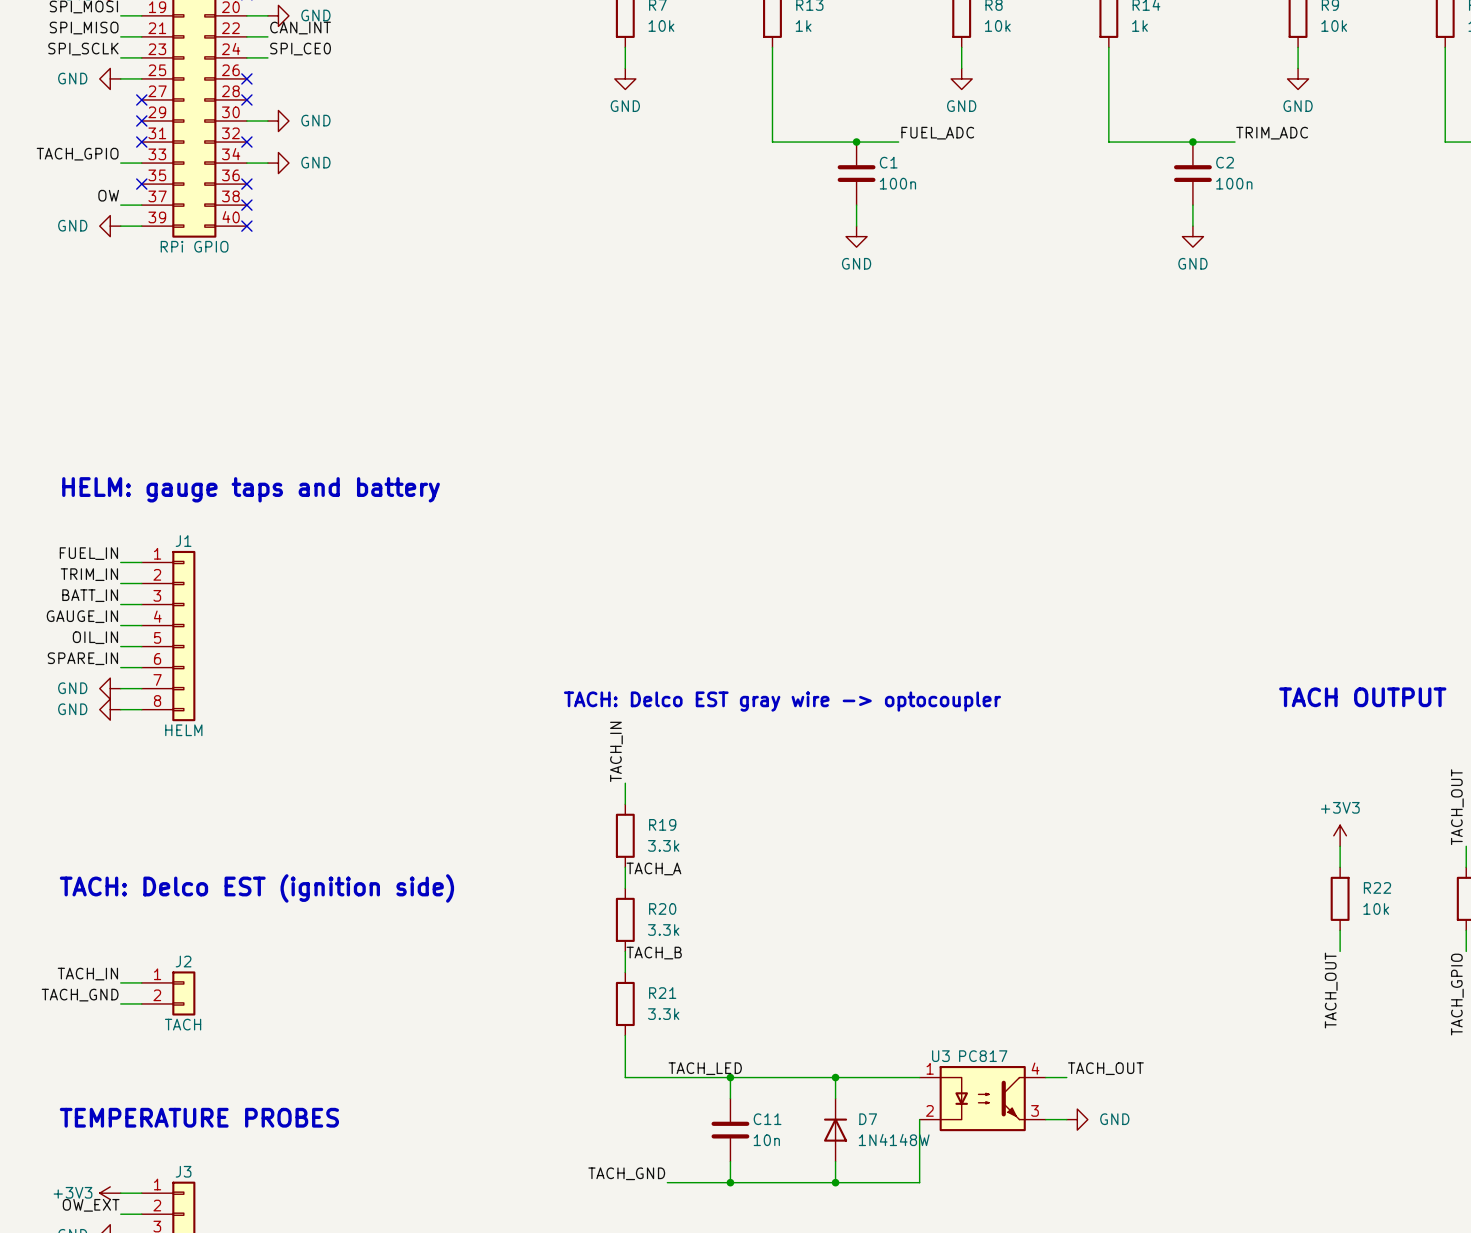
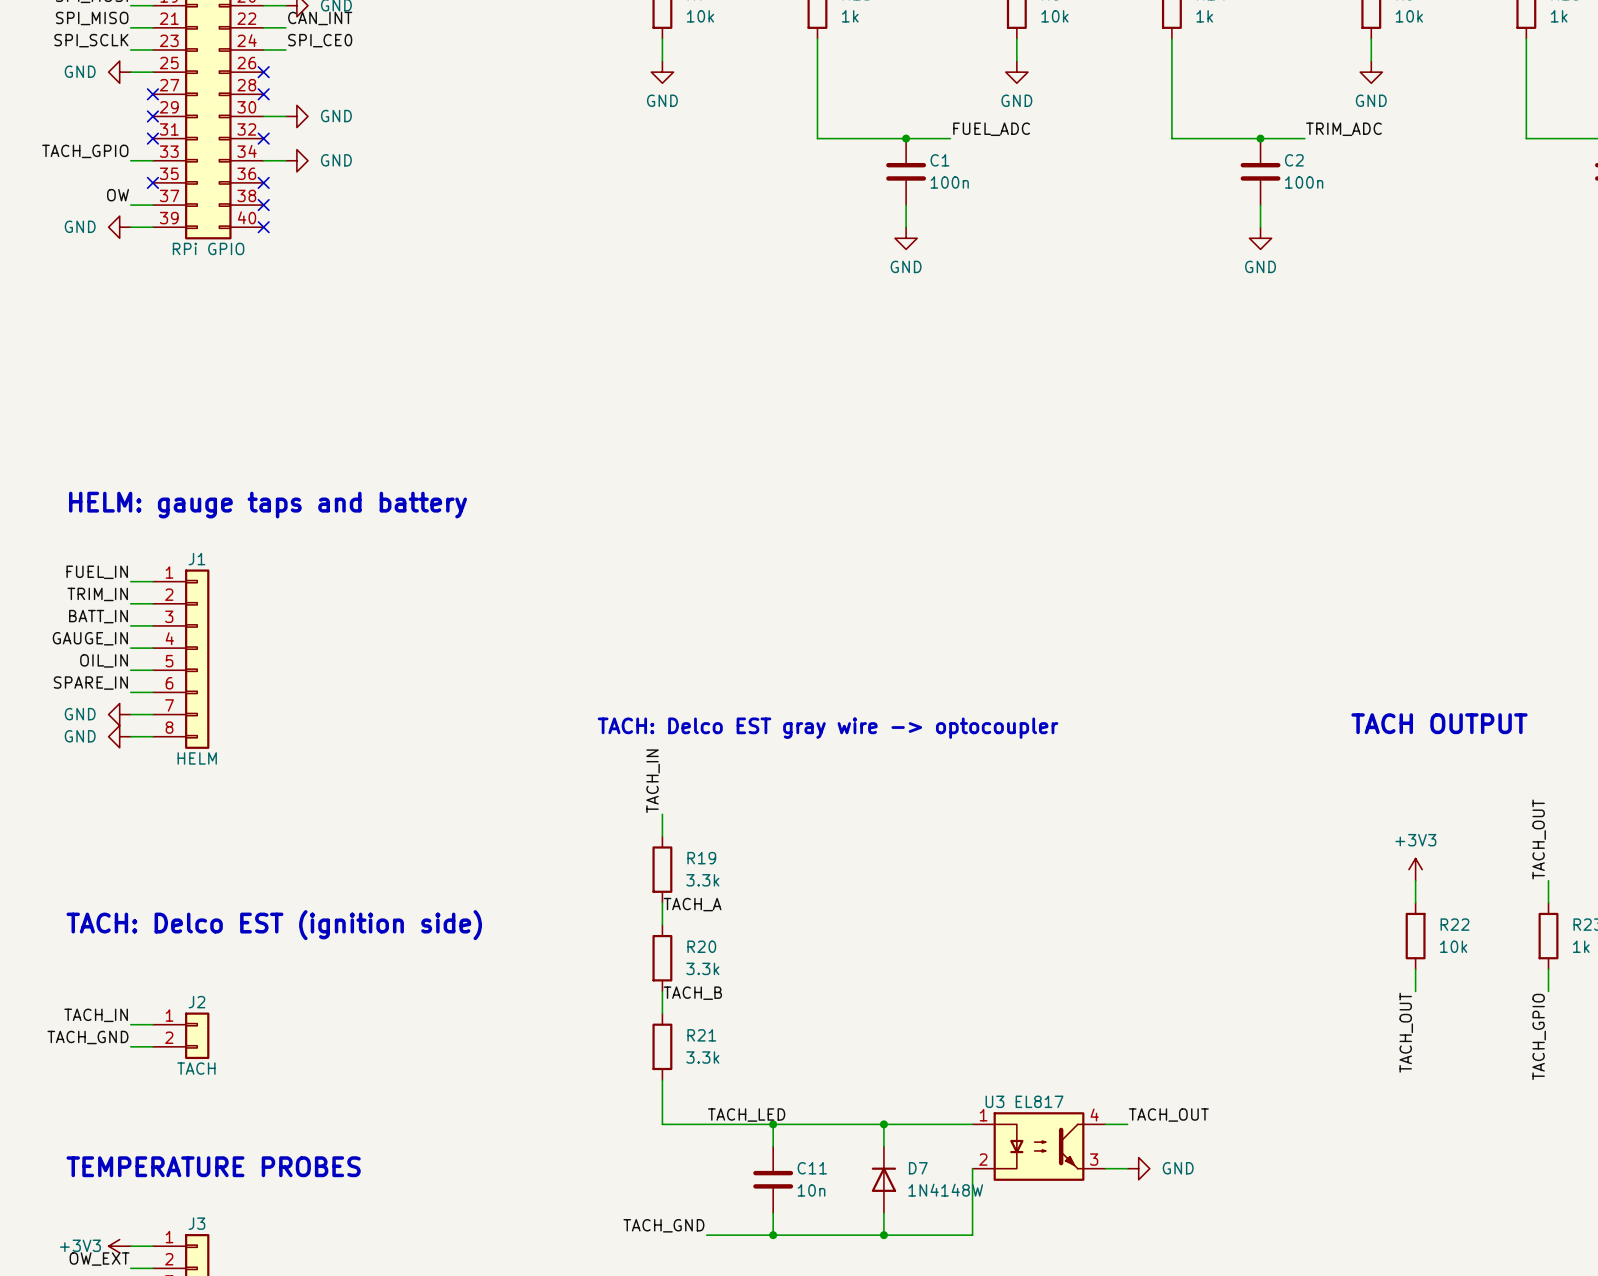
U3 value: PC817 (983, 1056) -> EL817 (1039, 1101)

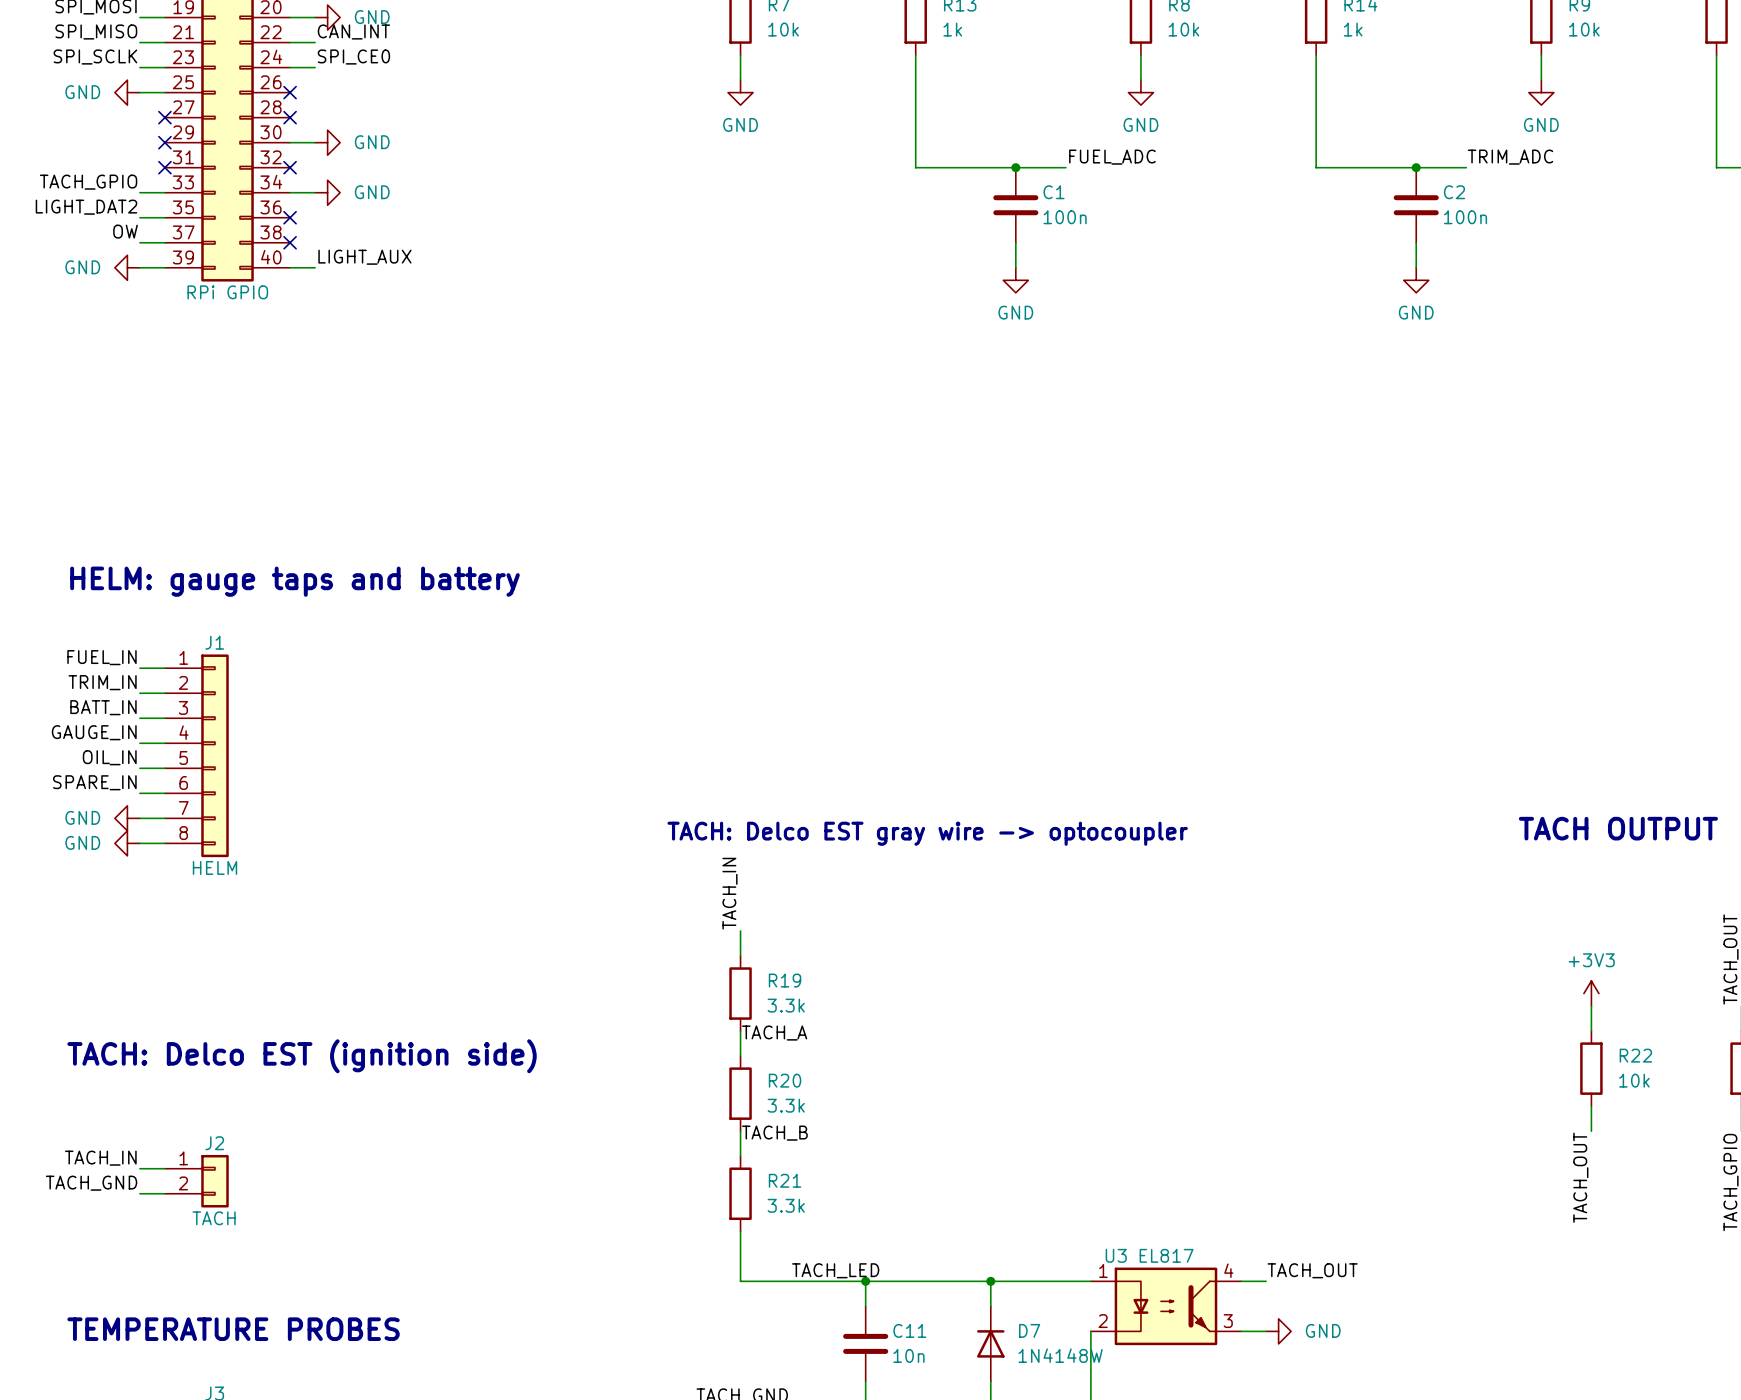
label: none -> LIGHT_DAT2 (86, 207)
wire: none -> (139, 217) (164, 217)
no-connect mark: (152, 182) -> none
label: none -> LIGHT_AUX (364, 257)
wire: none -> (290, 267) (315, 267)
no-connect mark: (263, 227) -> none

